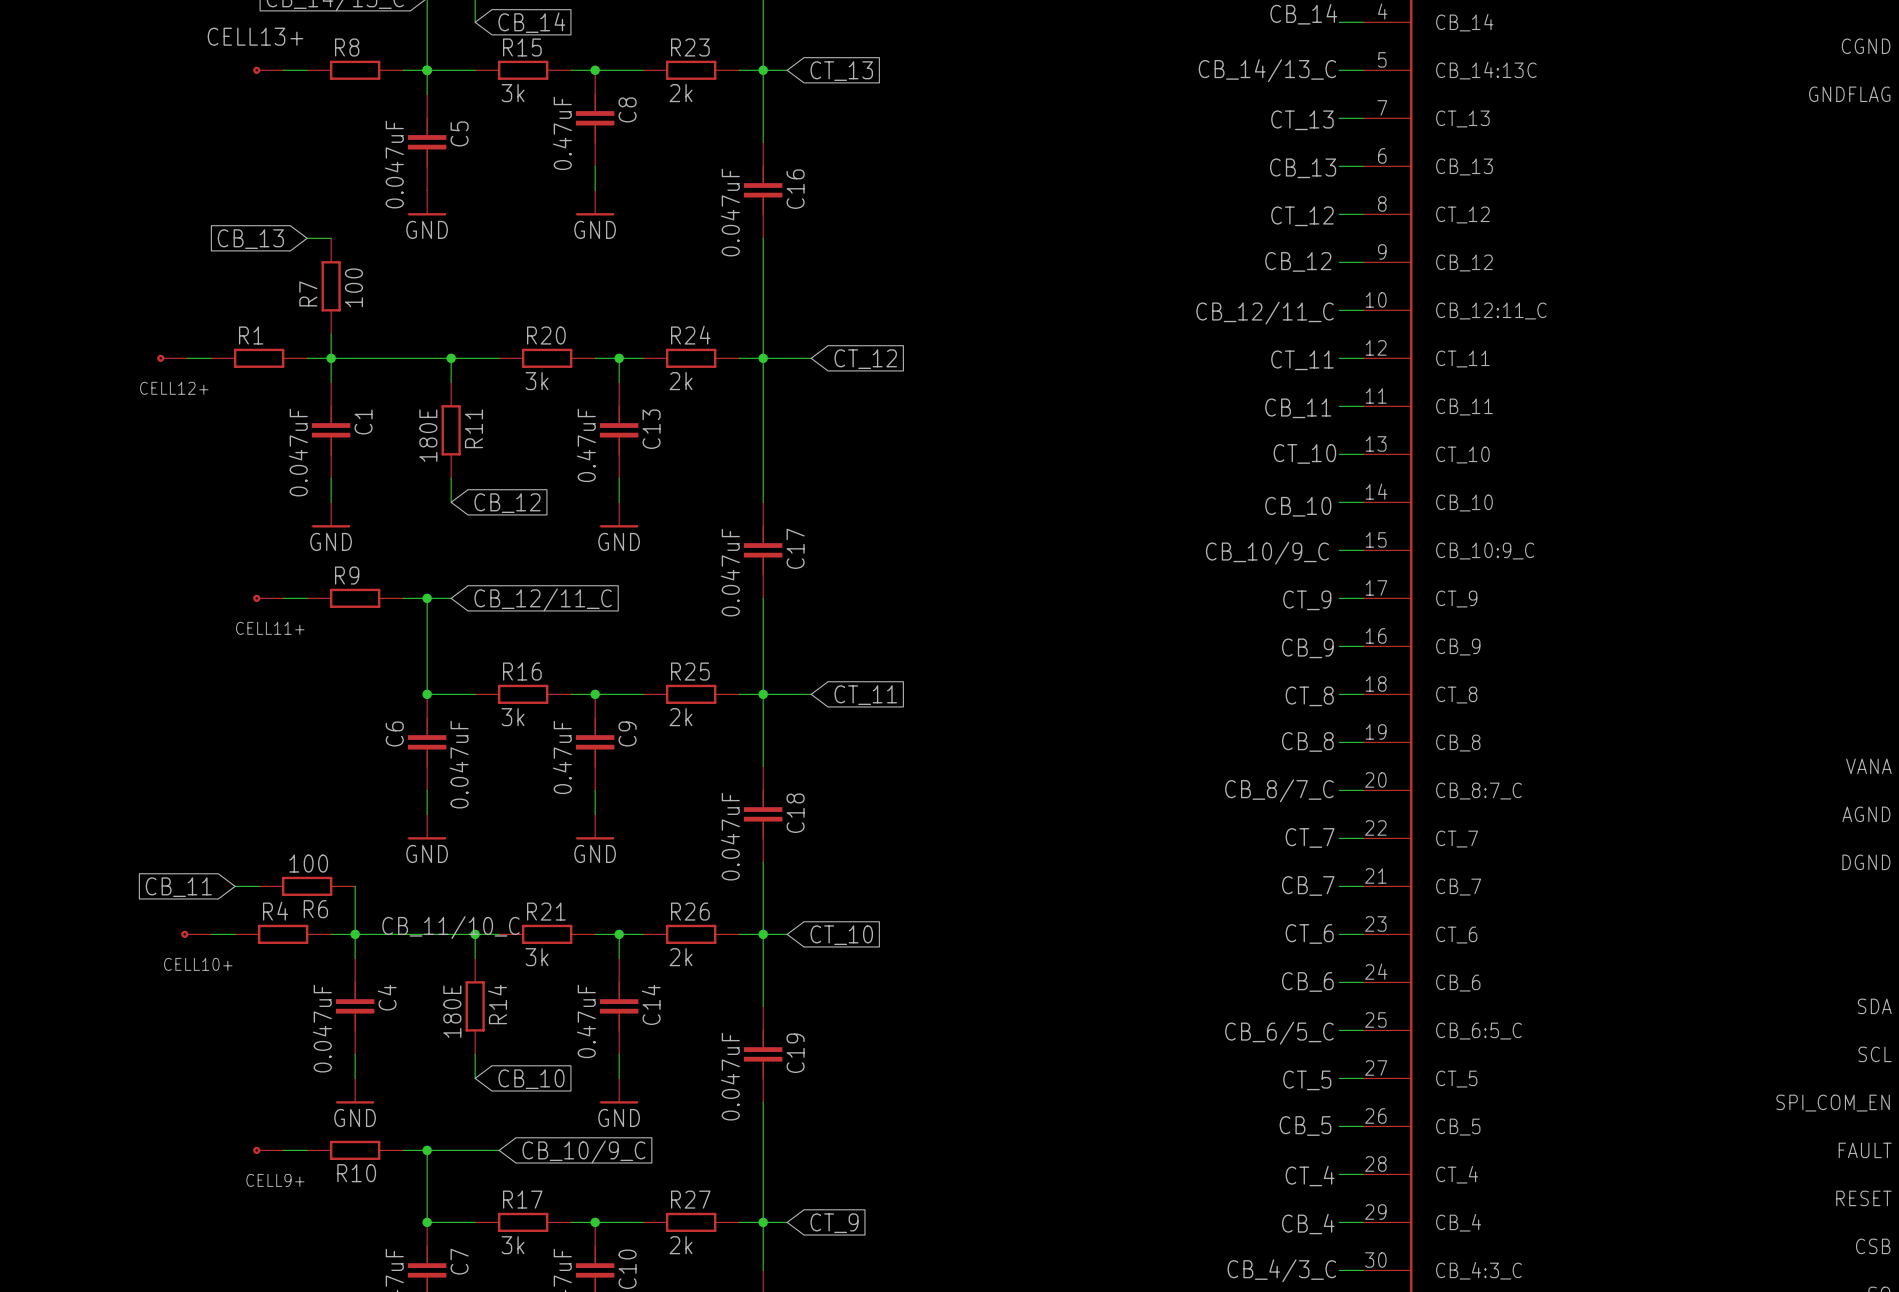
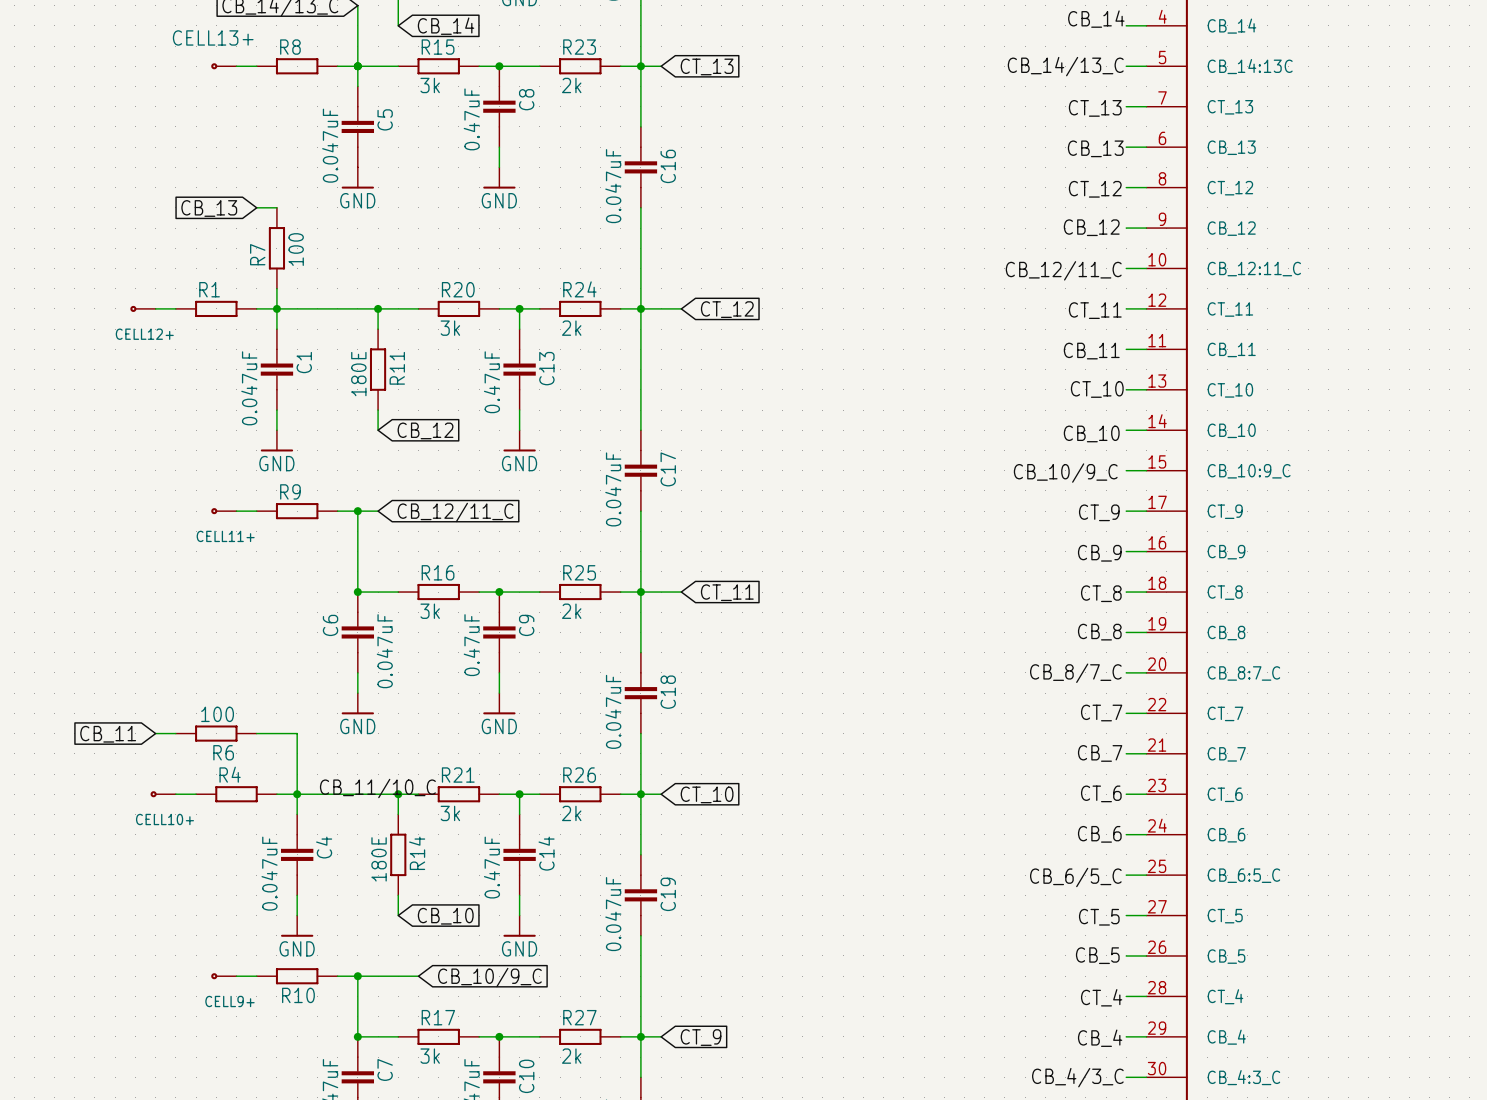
wire: none -> (256, 733) (297, 733) (297, 753)
wire: (235, 886) (259, 886) -> (155, 733) (175, 733)
R6 position: (307, 886) -> (216, 733)
global label position: CB_11 (178, 887) -> CB_11 (108, 734)

